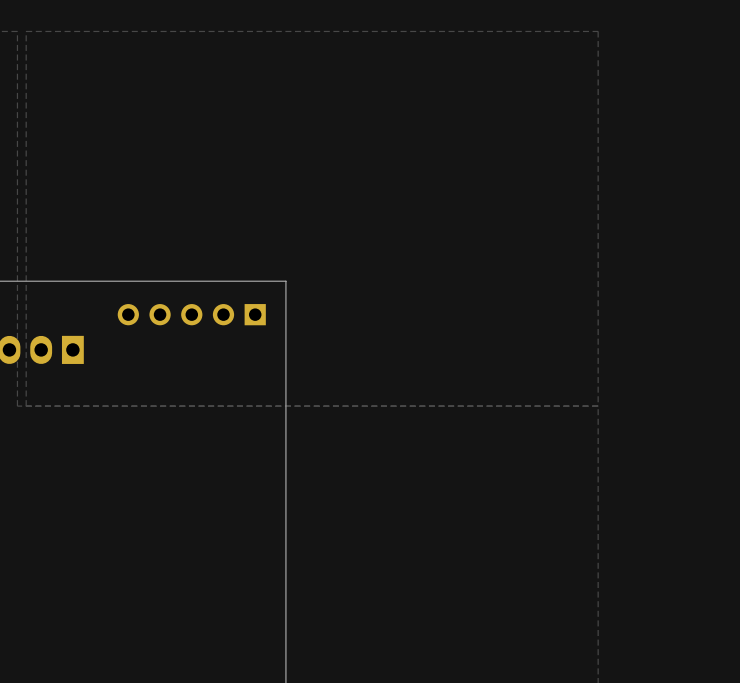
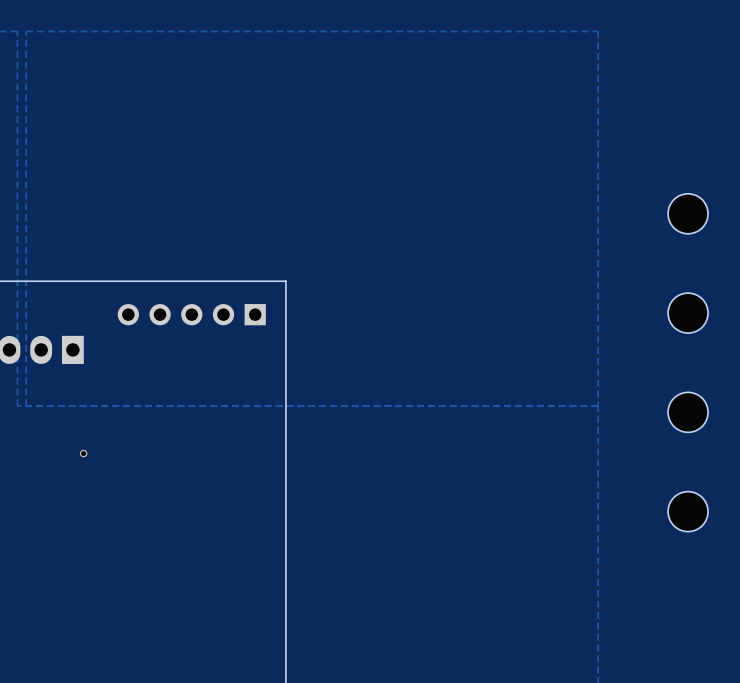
part: none -> (688, 213)
part: none -> (688, 313)
part: none -> (688, 412)
via: none -> (83, 453)
part: none -> (688, 511)

